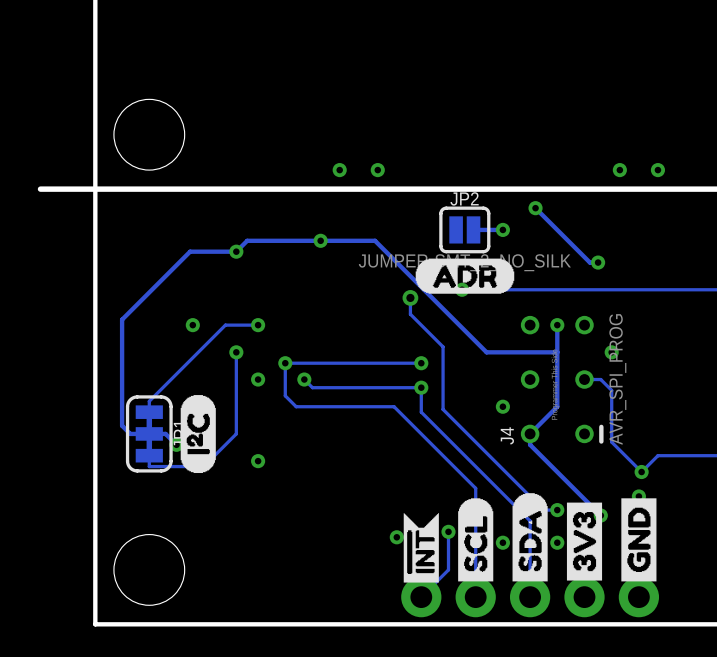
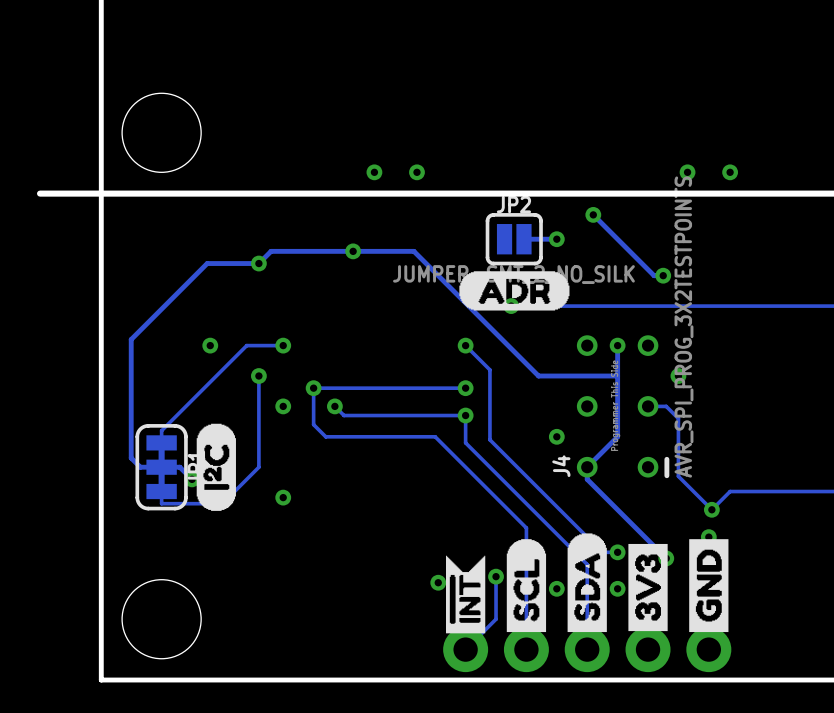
track: (410, 297) (410, 314) (421, 325) -> none
via: (410, 297) -> none
via: none -> (465, 345)
J4 value: AVR_SPI_PROG (617, 379) -> AVR_SPI_PROG_3X2TESTPOINTS (683, 327)

